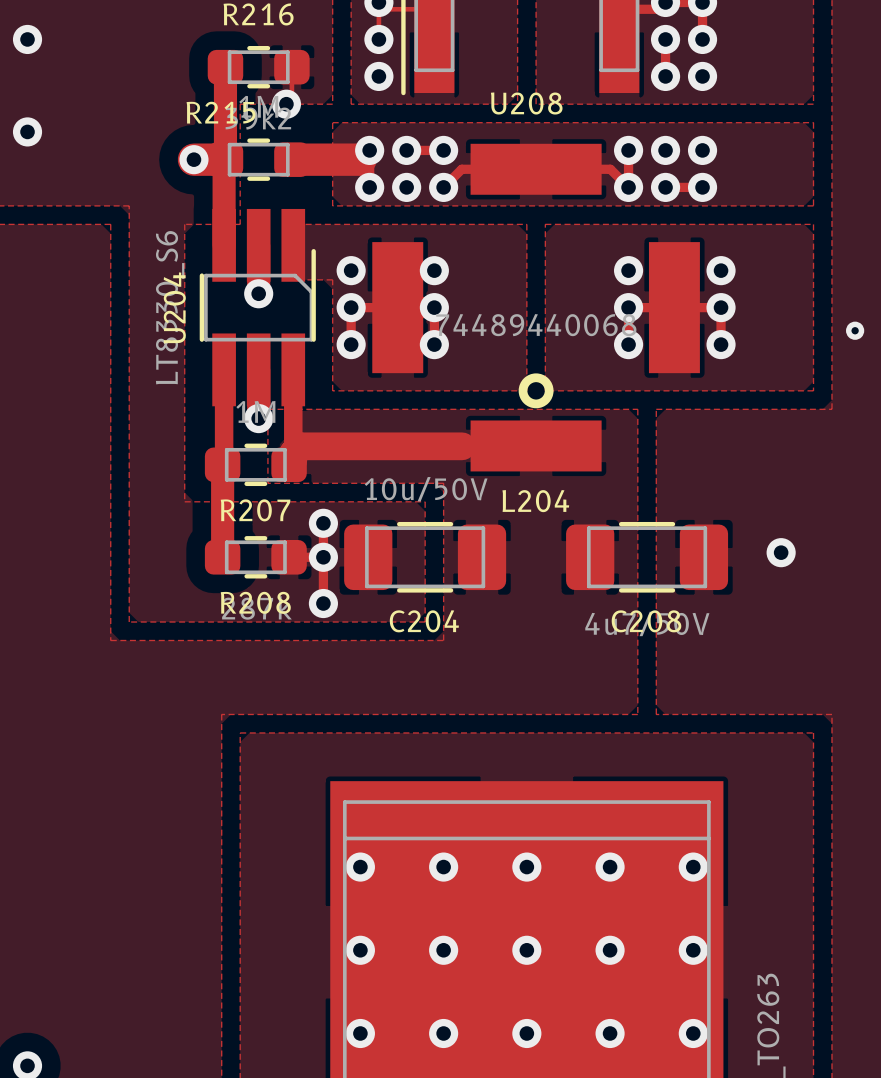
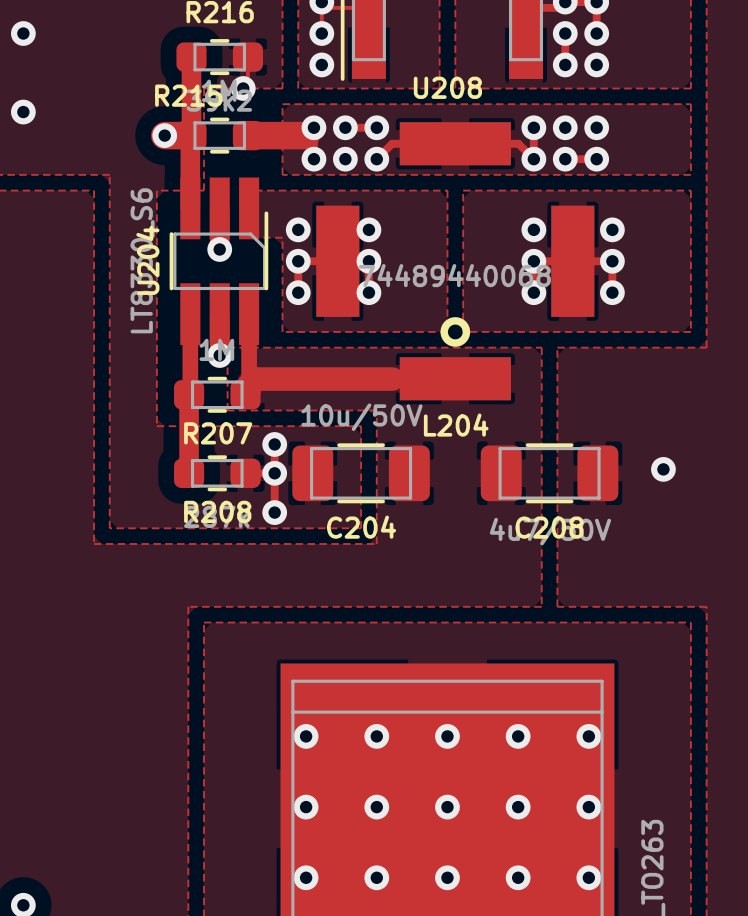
via: (855, 330) -> none

